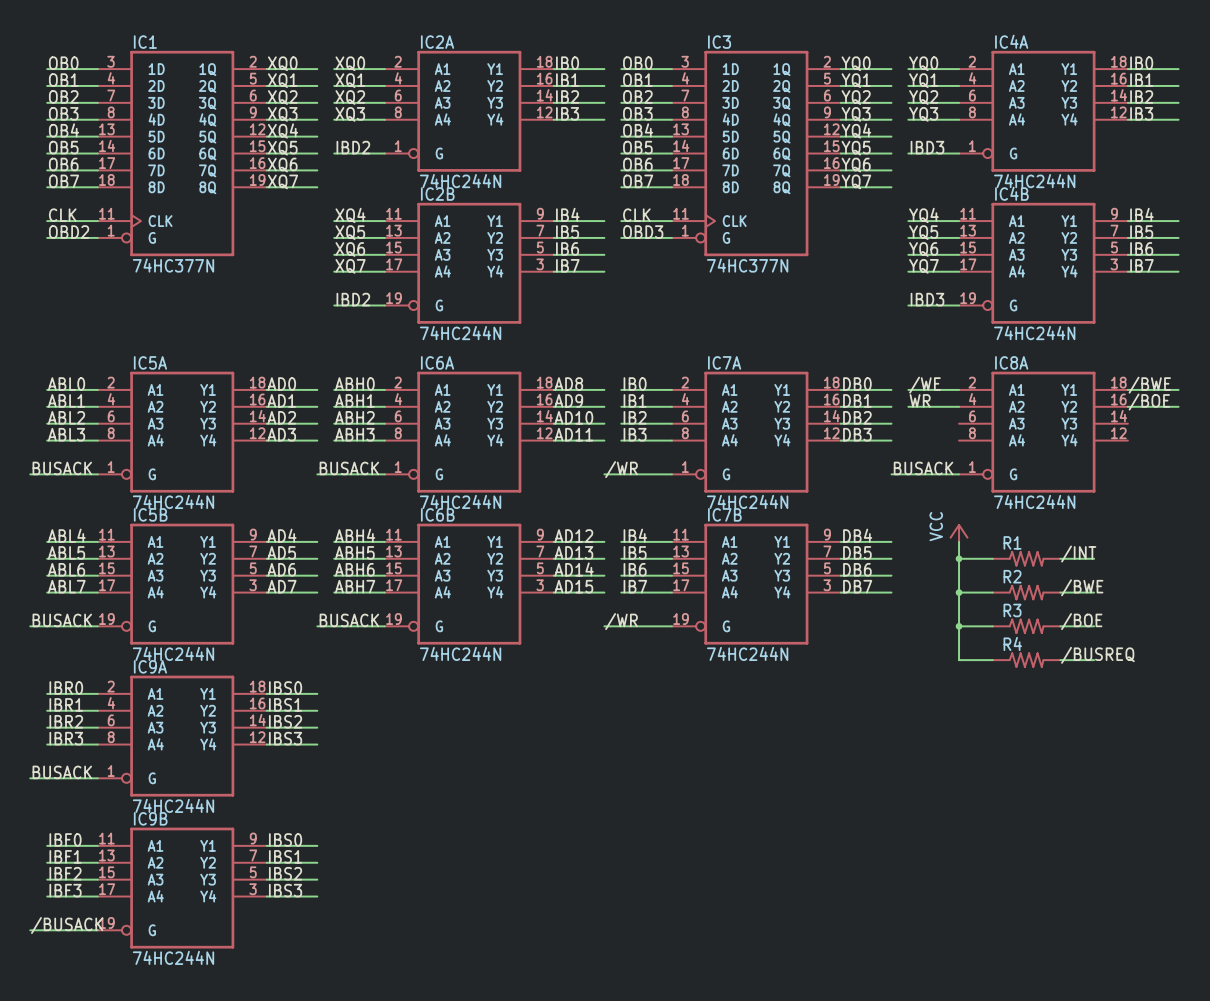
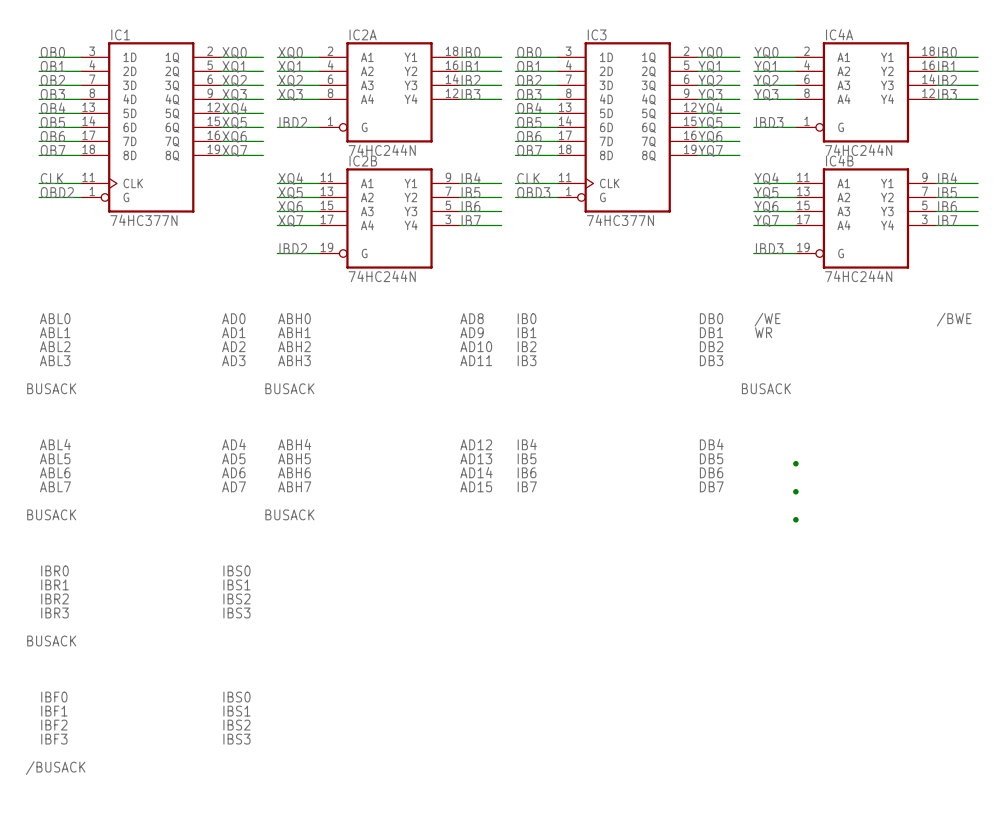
wire: (47, 389) (97, 389) -> none
wire: (266, 389) (317, 389) -> none
wire: (334, 389) (384, 389) -> none
wire: (553, 389) (604, 389) -> none
wire: (621, 389) (671, 389) -> none
wire: (840, 389) (891, 389) -> none
wire: (908, 389) (959, 389) -> none
wire: (1127, 389) (1178, 389) -> none
label: /BOE (1149, 402) -> none
wire: (47, 406) (97, 406) -> none
wire: (266, 406) (317, 406) -> none
wire: (334, 406) (384, 406) -> none
wire: (553, 406) (604, 406) -> none
wire: (621, 406) (671, 406) -> none
wire: (840, 406) (891, 406) -> none
wire: (908, 406) (959, 406) -> none
wire: (1127, 406) (1178, 406) -> none
wire: (47, 423) (97, 423) -> none
wire: (266, 423) (317, 423) -> none
wire: (334, 423) (384, 423) -> none
wire: (553, 423) (604, 423) -> none
wire: (621, 423) (671, 423) -> none
wire: (840, 423) (891, 423) -> none
IC5A: 74HC244N (182, 432) -> none
IC6A: 74HC244N (469, 432) -> none
IC7A: 74HC244N (756, 432) -> none
IC8A: 74HC244N (1043, 432) -> none
wire: (47, 440) (97, 440) -> none
wire: (266, 440) (317, 440) -> none
wire: (334, 440) (384, 440) -> none
wire: (553, 440) (604, 440) -> none
wire: (621, 440) (671, 440) -> none
wire: (840, 440) (891, 440) -> none
label: /WR (621, 469) -> none
wire: (30, 474) (97, 474) -> none
wire: (317, 474) (384, 474) -> none
wire: (604, 474) (671, 474) -> none
wire: (891, 474) (959, 474) -> none
power symbol: VCC (959, 533) -> none
wire: (47, 541) (97, 541) -> none
wire: (266, 541) (317, 541) -> none
wire: (334, 541) (384, 541) -> none
wire: (553, 541) (604, 541) -> none
wire: (621, 541) (671, 541) -> none
wire: (840, 541) (891, 541) -> none
wire: (959, 541) (959, 660) (992, 660) -> none
label: /INT (1078, 554) -> none
wire: (47, 558) (97, 558) -> none
wire: (266, 558) (317, 558) -> none
wire: (334, 558) (384, 558) -> none
wire: (553, 558) (604, 558) -> none
wire: (621, 558) (671, 558) -> none
wire: (840, 558) (891, 558) -> none
wire: (959, 558) (992, 558) -> none
R1: (1026, 558) -> none
wire: (1060, 558) (1094, 558) -> none
wire: (47, 575) (97, 575) -> none
wire: (266, 575) (317, 575) -> none
wire: (334, 575) (384, 575) -> none
wire: (553, 575) (604, 575) -> none
wire: (621, 575) (671, 575) -> none
wire: (840, 575) (891, 575) -> none
IC5B: 74HC244N (182, 584) -> none
IC6B: 74HC244N (469, 584) -> none
IC7B: 74HC244N (756, 584) -> none
label: /BWE (1082, 587) -> none
wire: (47, 592) (97, 592) -> none
wire: (266, 592) (317, 592) -> none
wire: (334, 592) (384, 592) -> none
wire: (553, 592) (604, 592) -> none
wire: (621, 592) (671, 592) -> none
wire: (840, 592) (891, 592) -> none
wire: (959, 592) (992, 592) -> none
R2: (1026, 592) -> none
wire: (1060, 592) (1094, 592) -> none
label: /WR (621, 621) -> none
label: /BOE (1081, 621) -> none
wire: (30, 626) (97, 626) -> none
wire: (317, 626) (384, 626) -> none
wire: (604, 626) (671, 626) -> none
wire: (959, 626) (992, 626) -> none
R3: (1026, 626) -> none
wire: (1060, 626) (1094, 626) -> none
label: /BUSREQ (1097, 655) -> none
R4: (1026, 660) -> none
wire: (1060, 660) (1094, 660) -> none
wire: (47, 693) (97, 693) -> none
wire: (266, 693) (317, 693) -> none
wire: (47, 710) (97, 710) -> none
wire: (266, 710) (317, 710) -> none
wire: (47, 727) (97, 727) -> none
wire: (266, 727) (317, 727) -> none
IC9A: 74HC244N (182, 736) -> none
wire: (47, 744) (97, 744) -> none
wire: (266, 744) (317, 744) -> none
wire: (30, 778) (97, 778) -> none
wire: (47, 845) (97, 845) -> none
wire: (266, 845) (317, 845) -> none
wire: (47, 862) (97, 862) -> none
wire: (266, 862) (317, 862) -> none
wire: (47, 879) (97, 879) -> none
wire: (266, 879) (317, 879) -> none
IC9B: 74HC244N (182, 888) -> none
wire: (47, 896) (97, 896) -> none
wire: (266, 896) (317, 896) -> none
wire: (30, 930) (97, 930) -> none

